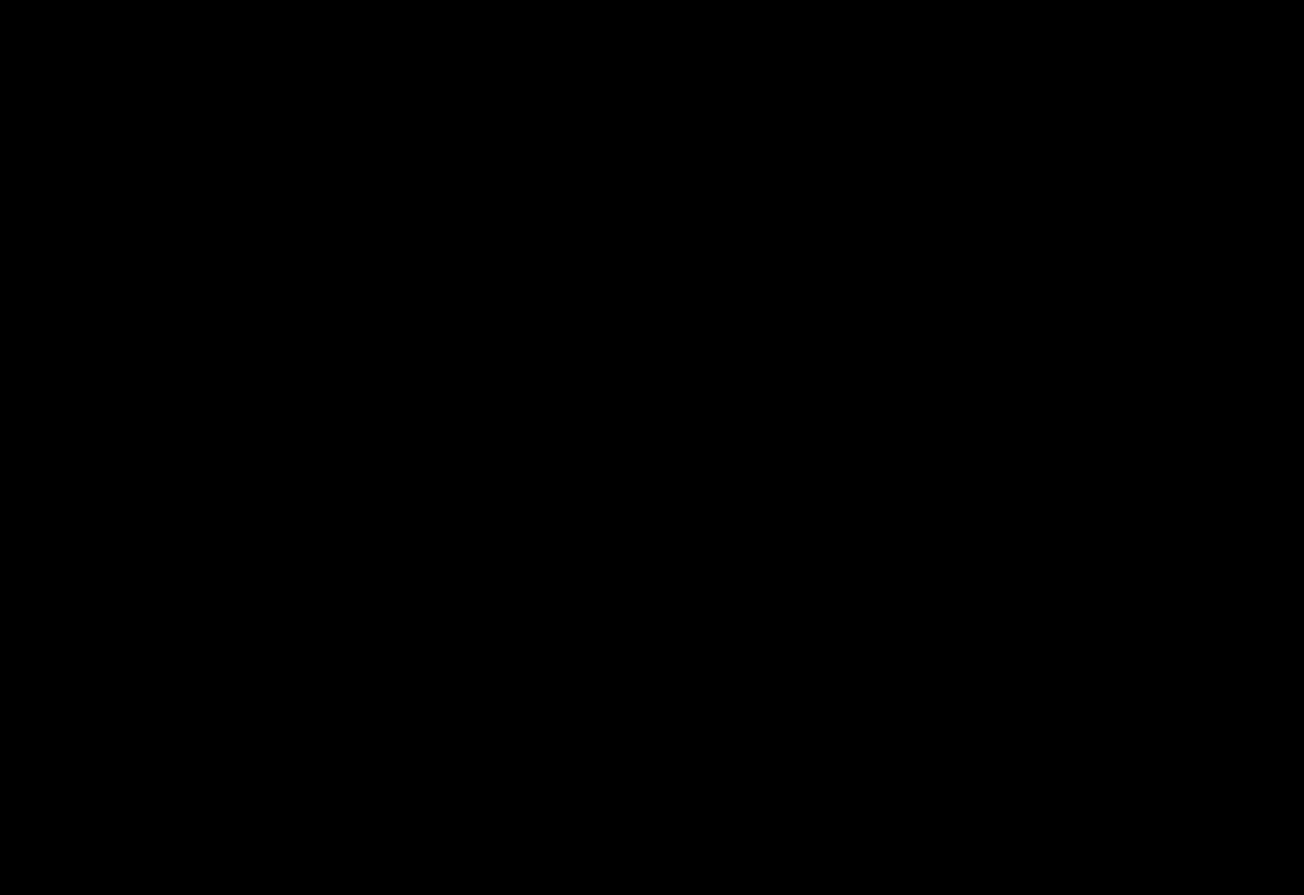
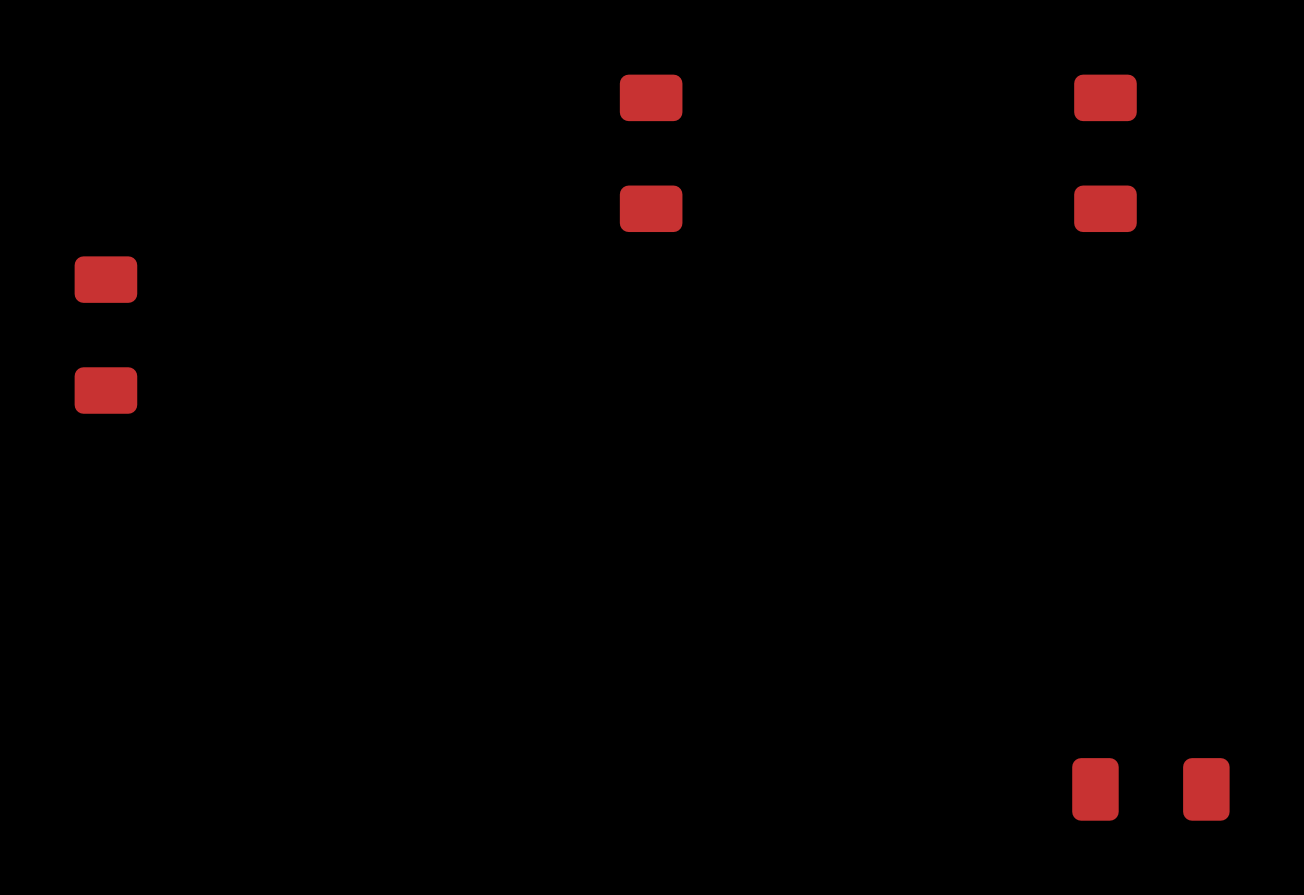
part: none -> (651, 153)
part: none -> (1105, 153)
part: none -> (105, 335)
part: none -> (1150, 789)

